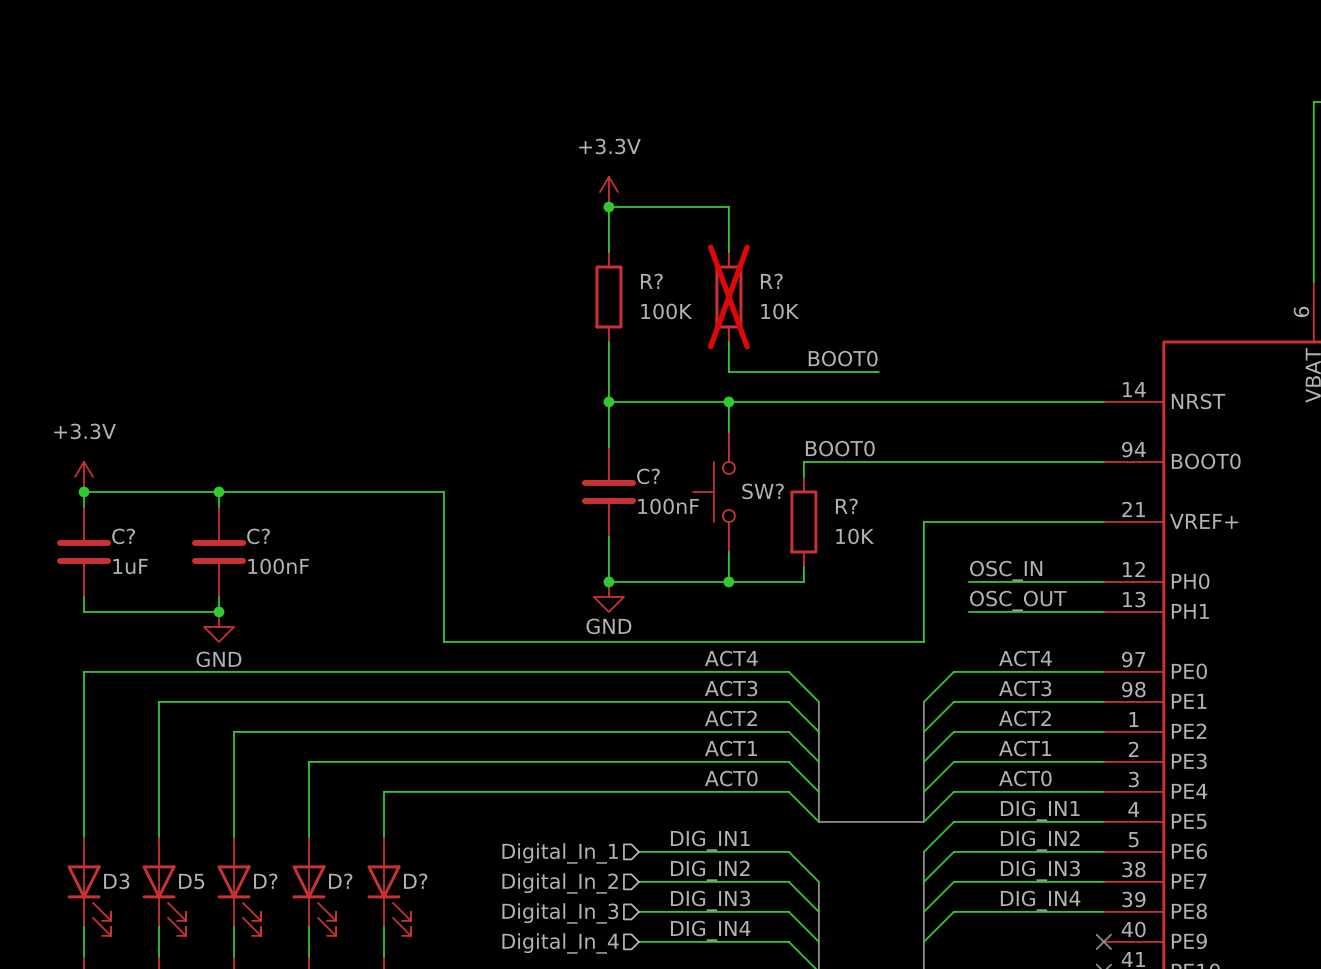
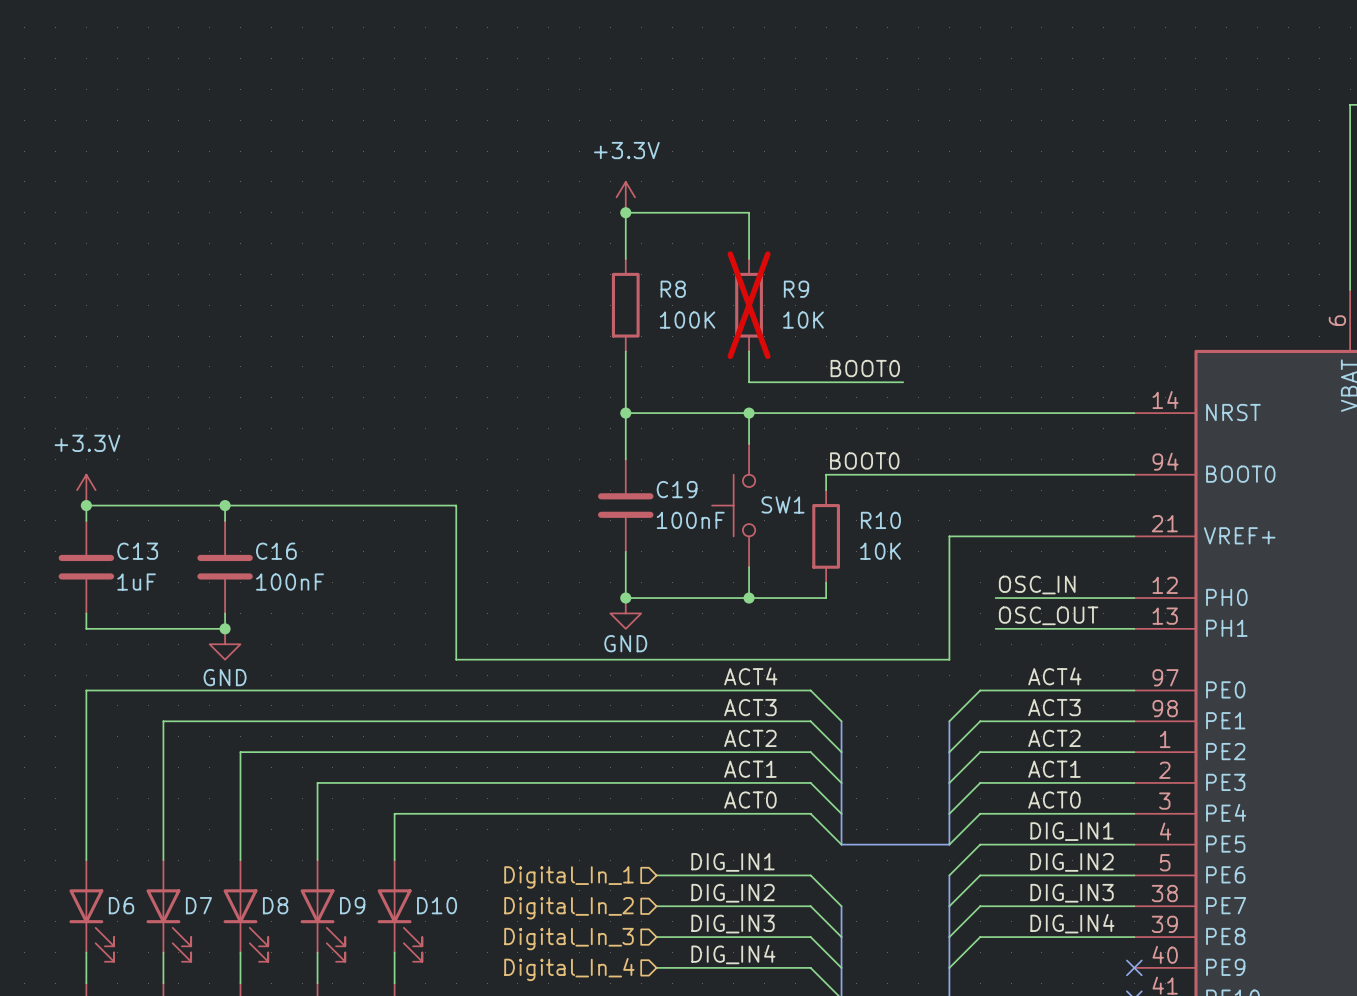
R? name: R? (651, 281) -> R8 (673, 289)
R? name: R? (771, 281) -> R9 (796, 289)
C? name: C? (648, 476) -> C19 (677, 489)
SW? name: SW? (763, 491) -> SW1 (783, 504)
R? name: R? (846, 506) -> R10 (880, 520)
C? name: C? (123, 536) -> C13 (137, 551)
C? name: C? (258, 536) -> C16 (276, 551)
D3 name: D3 (116, 881) -> D6 (121, 905)
D5 name: D5 (191, 881) -> D7 (198, 905)
D? name: D? (265, 881) -> D8 (275, 905)
D? name: D? (340, 881) -> D9 (352, 905)
D? name: D? (415, 881) -> D10 (437, 905)

